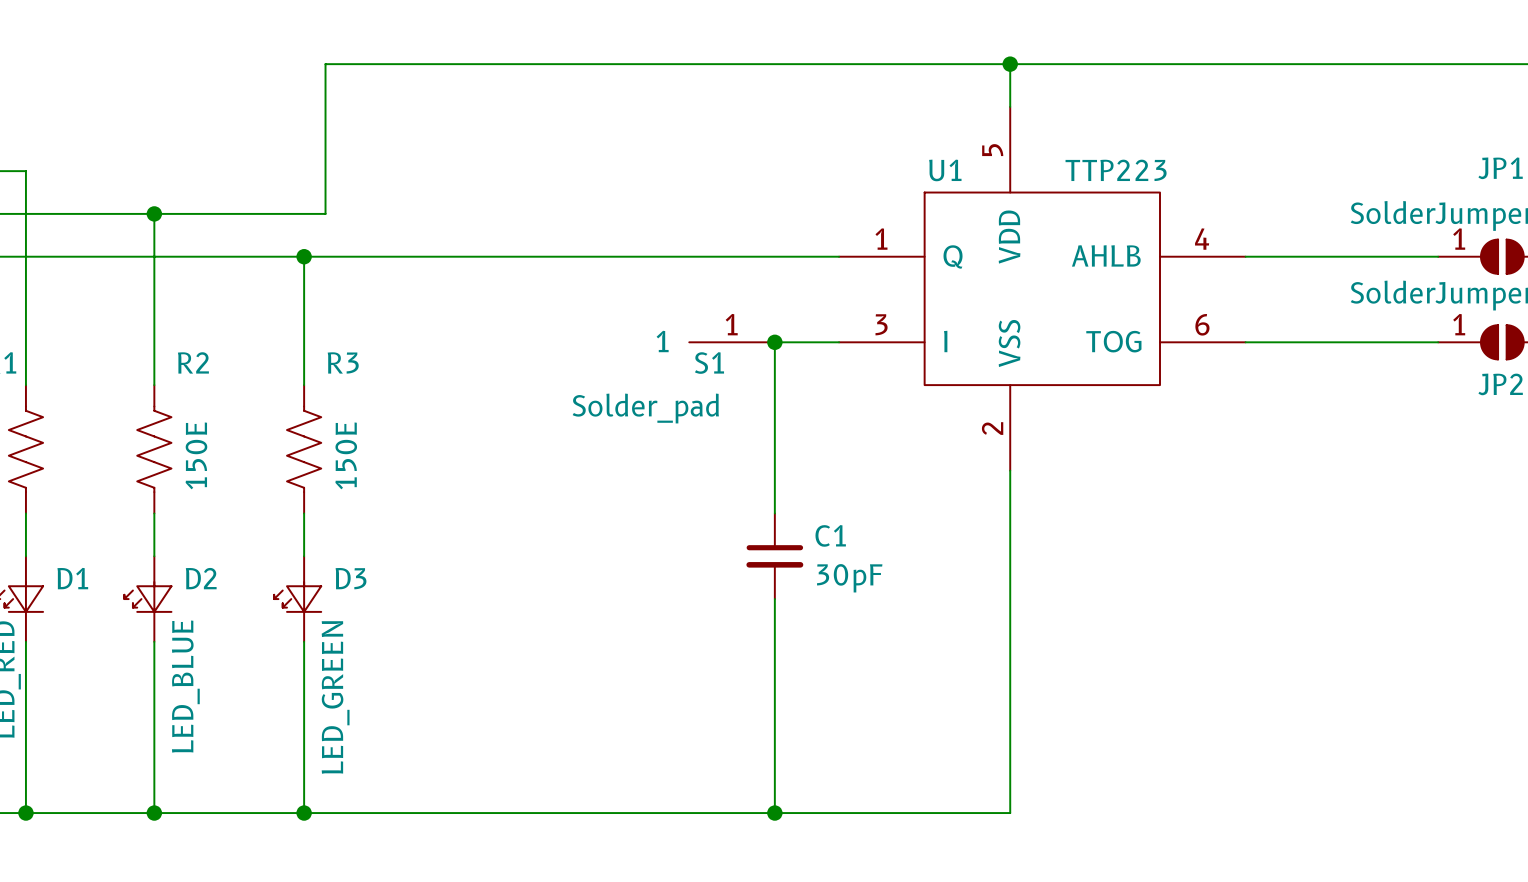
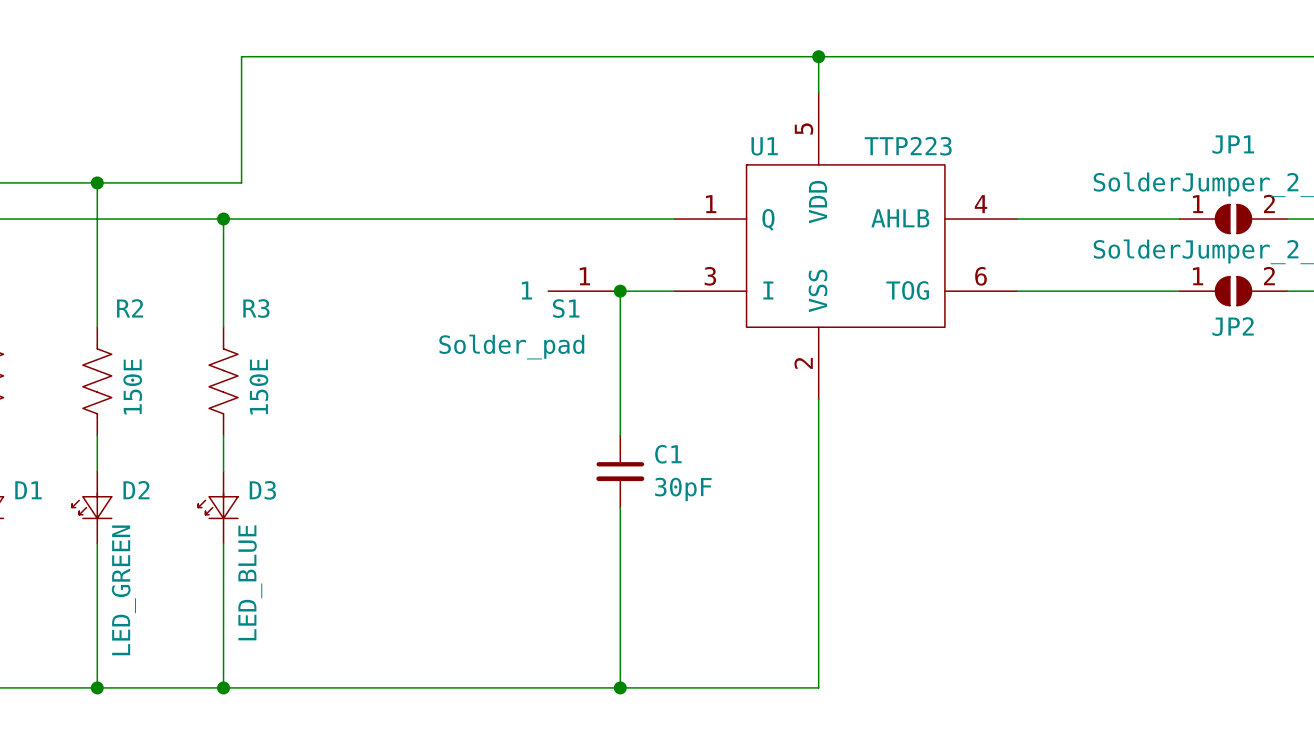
D2 value: LED_BLUE (185, 686) -> LED_GREEN (123, 590)
D3 value: LED_GREEN (335, 697) -> LED_BLUE (250, 582)

